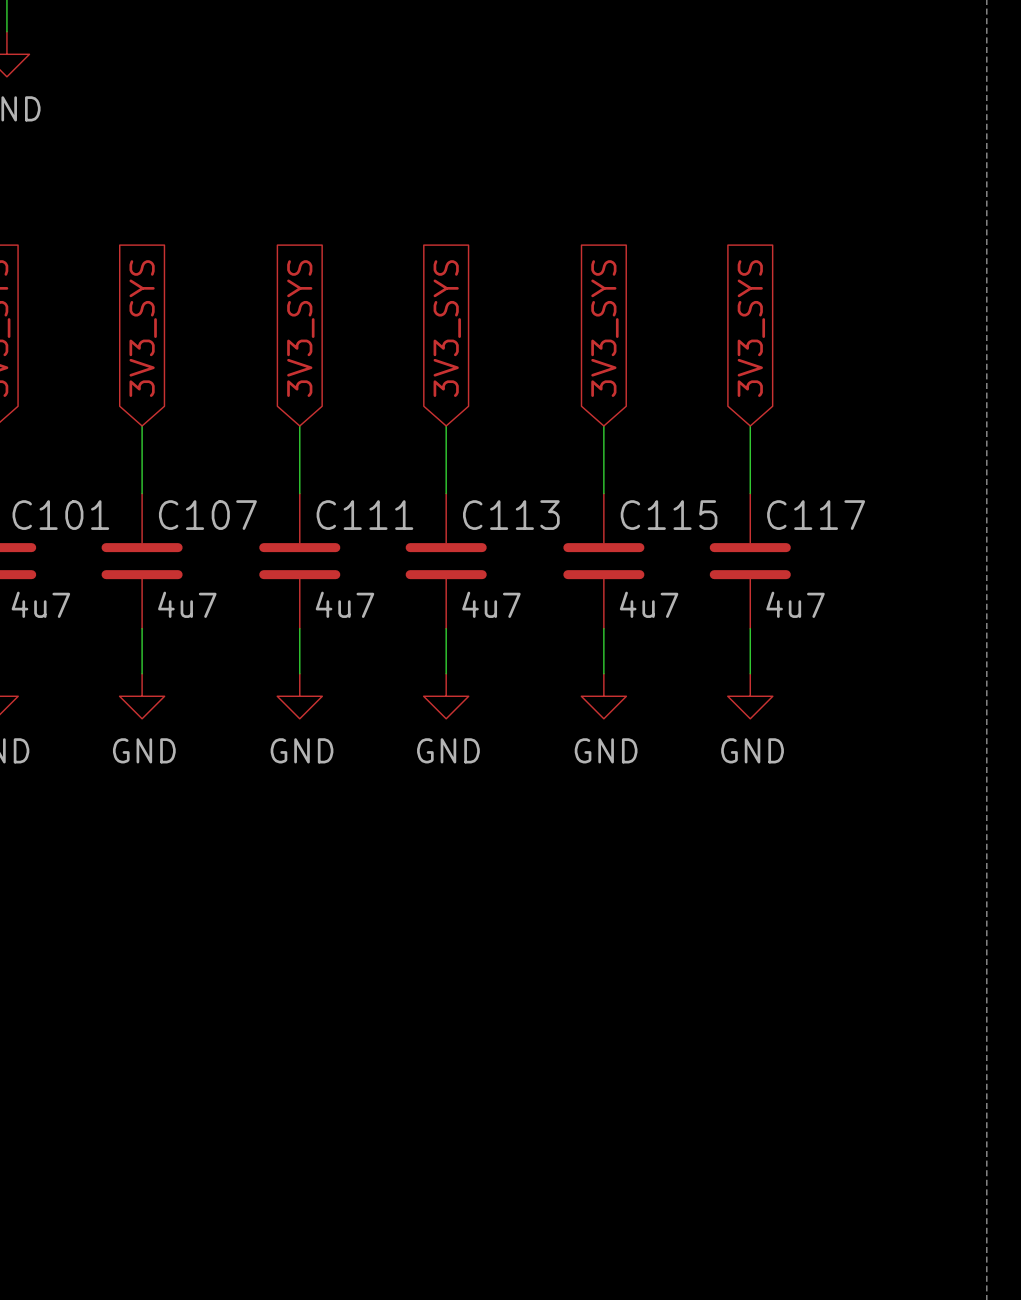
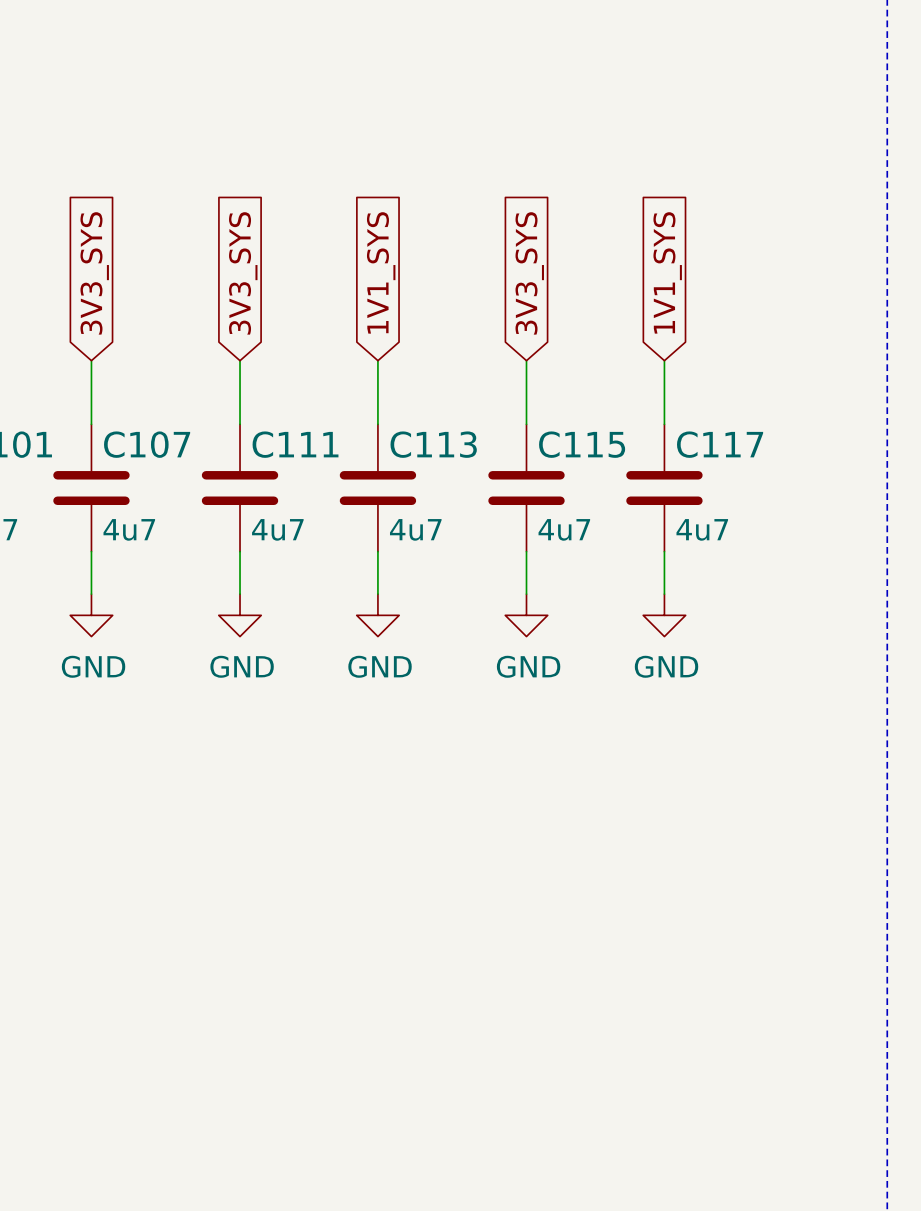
global label: 3V3_SYS (447, 328) -> 1V1_SYS (381, 272)
global label: 3V3_SYS (751, 328) -> 1V1_SYS (667, 272)

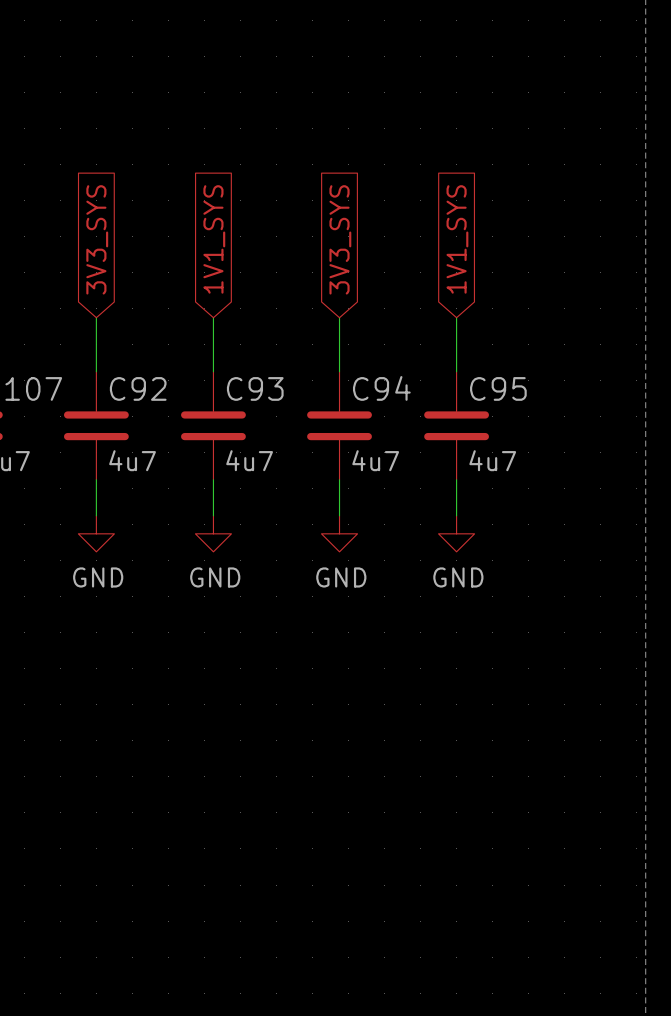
C111 name: C111 (295, 444) -> C92 (138, 388)
C113 name: C113 (433, 444) -> C93 (255, 388)
C115 name: C115 (582, 444) -> C94 (381, 388)
C117 name: C117 (720, 444) -> C95 (498, 388)

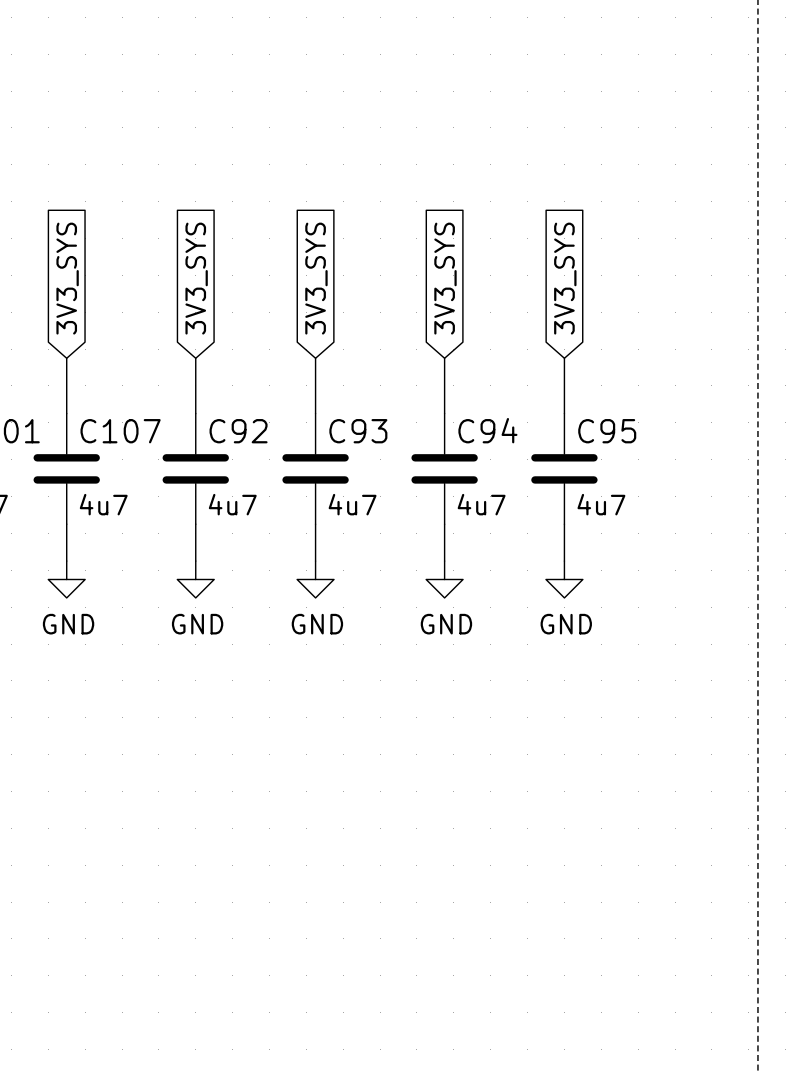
global label: 1V1_SYS (214, 239) -> 3V3_SYS (316, 278)
global label: 1V1_SYS (457, 239) -> 3V3_SYS (565, 278)

